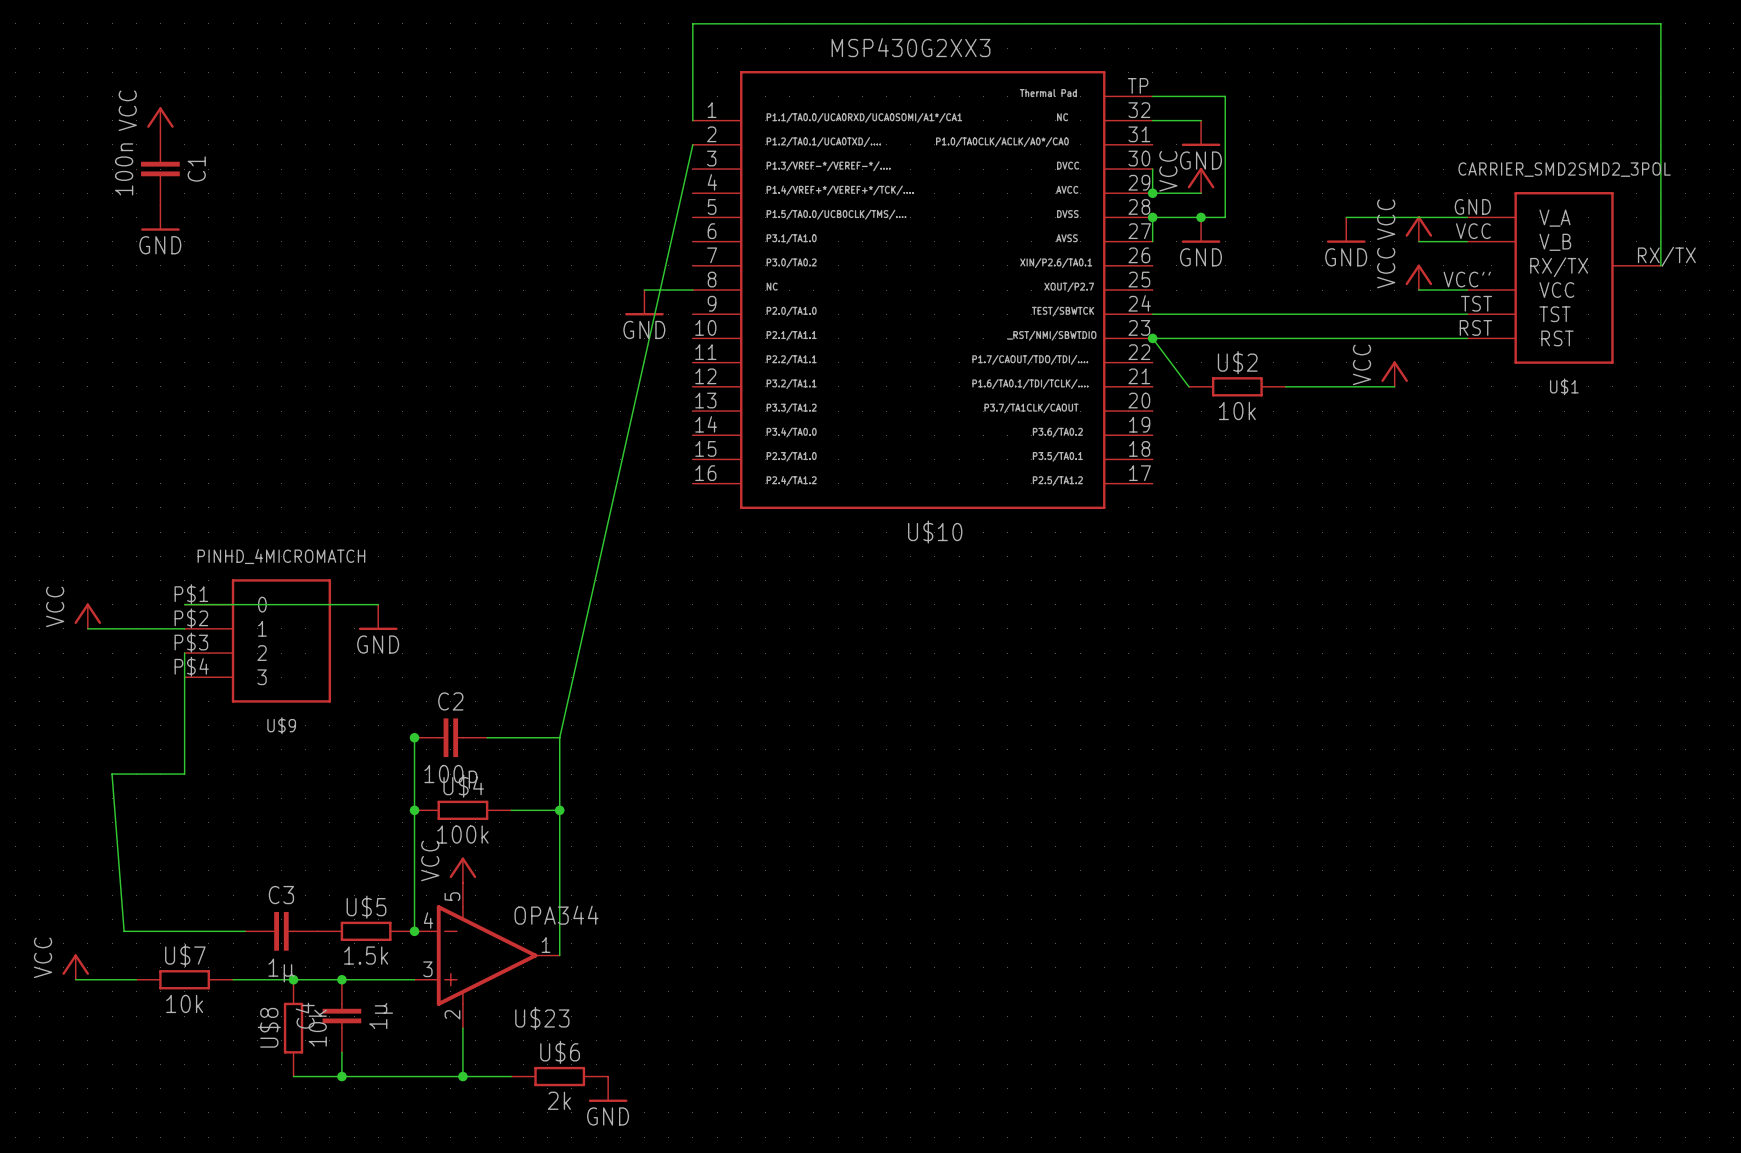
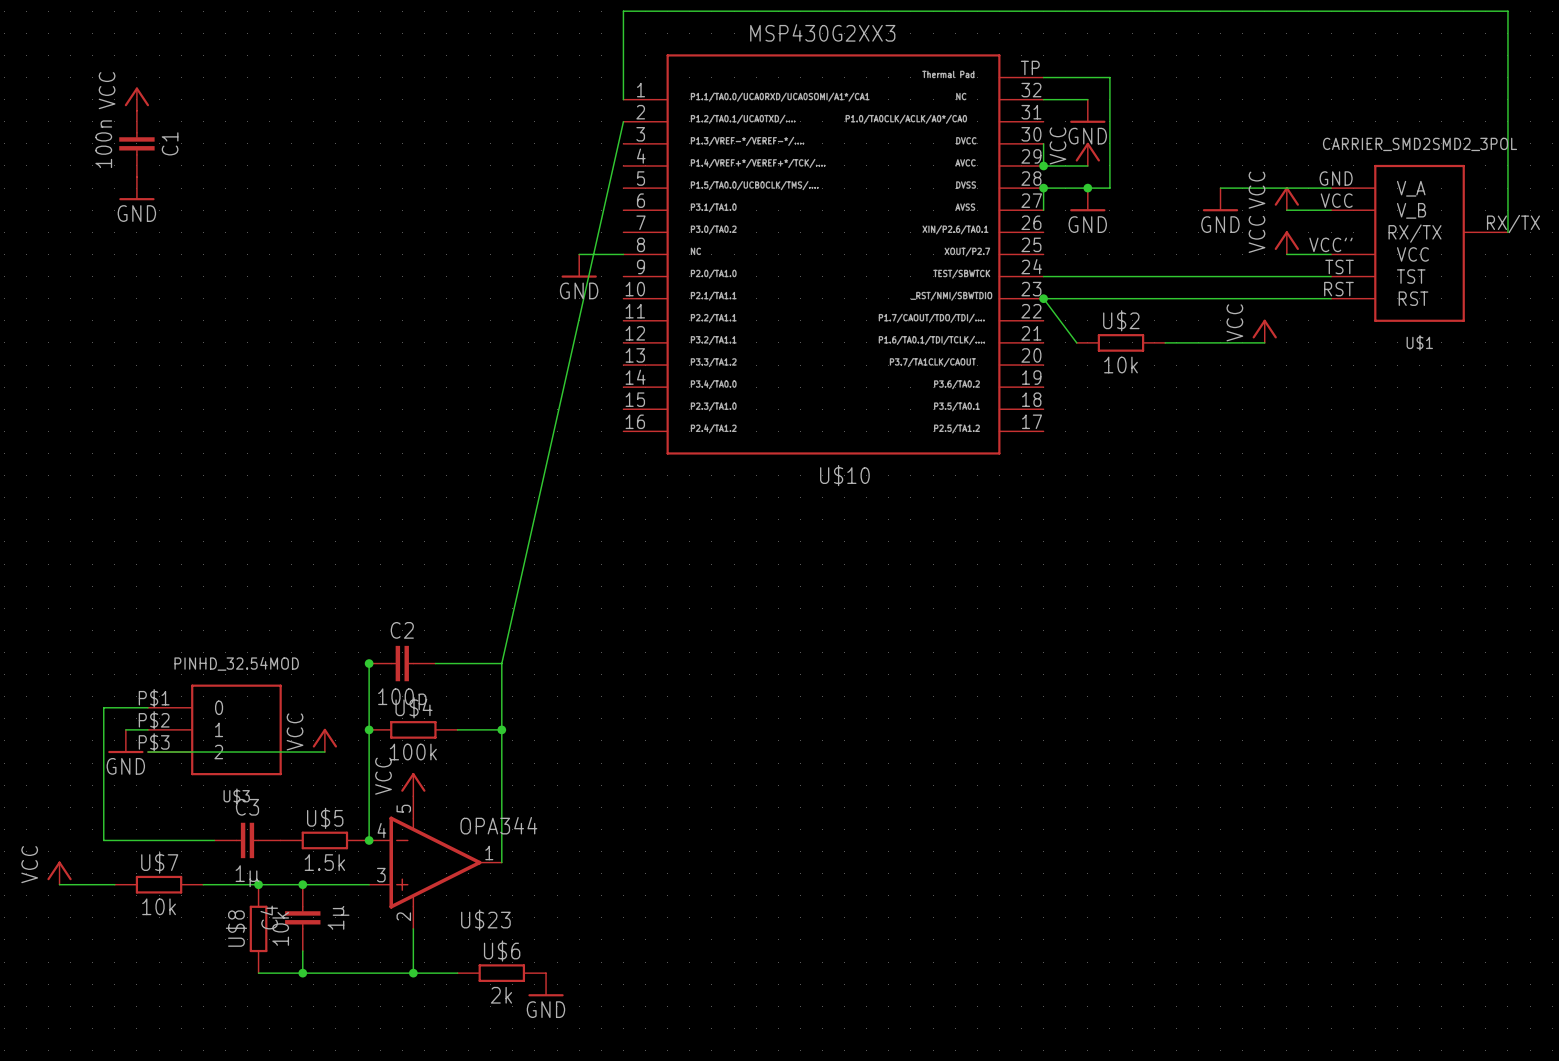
wire: (184, 604) (378, 604) -> (147, 752) (324, 752)
power symbol: VCC (87, 616) -> none
power symbol: GND (378, 617) -> none
wire: (87, 628) (184, 628) -> none
U$9: PINHD_4MICROMATCH (257, 640) -> none
wire: (184, 653) (184, 774) (112, 774) (124, 931) -> (147, 707) (103, 707) (103, 840)
wire: none -> (125, 729) (147, 729)
U$3: none -> PINHD_32.54MOD (214, 729)
power symbol: none -> VCC (324, 740)
power symbol: none -> GND (125, 741)

